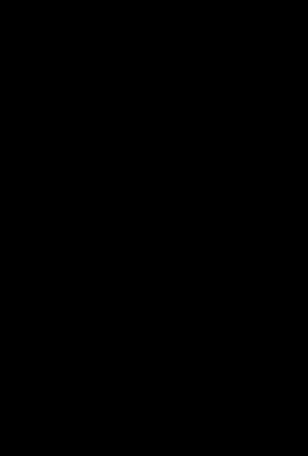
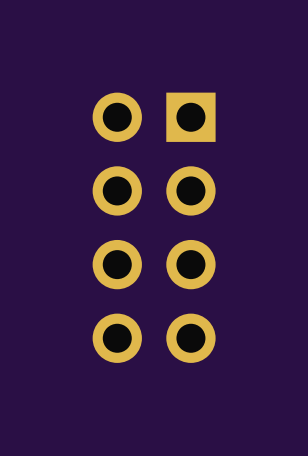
part: none -> (154, 227)

